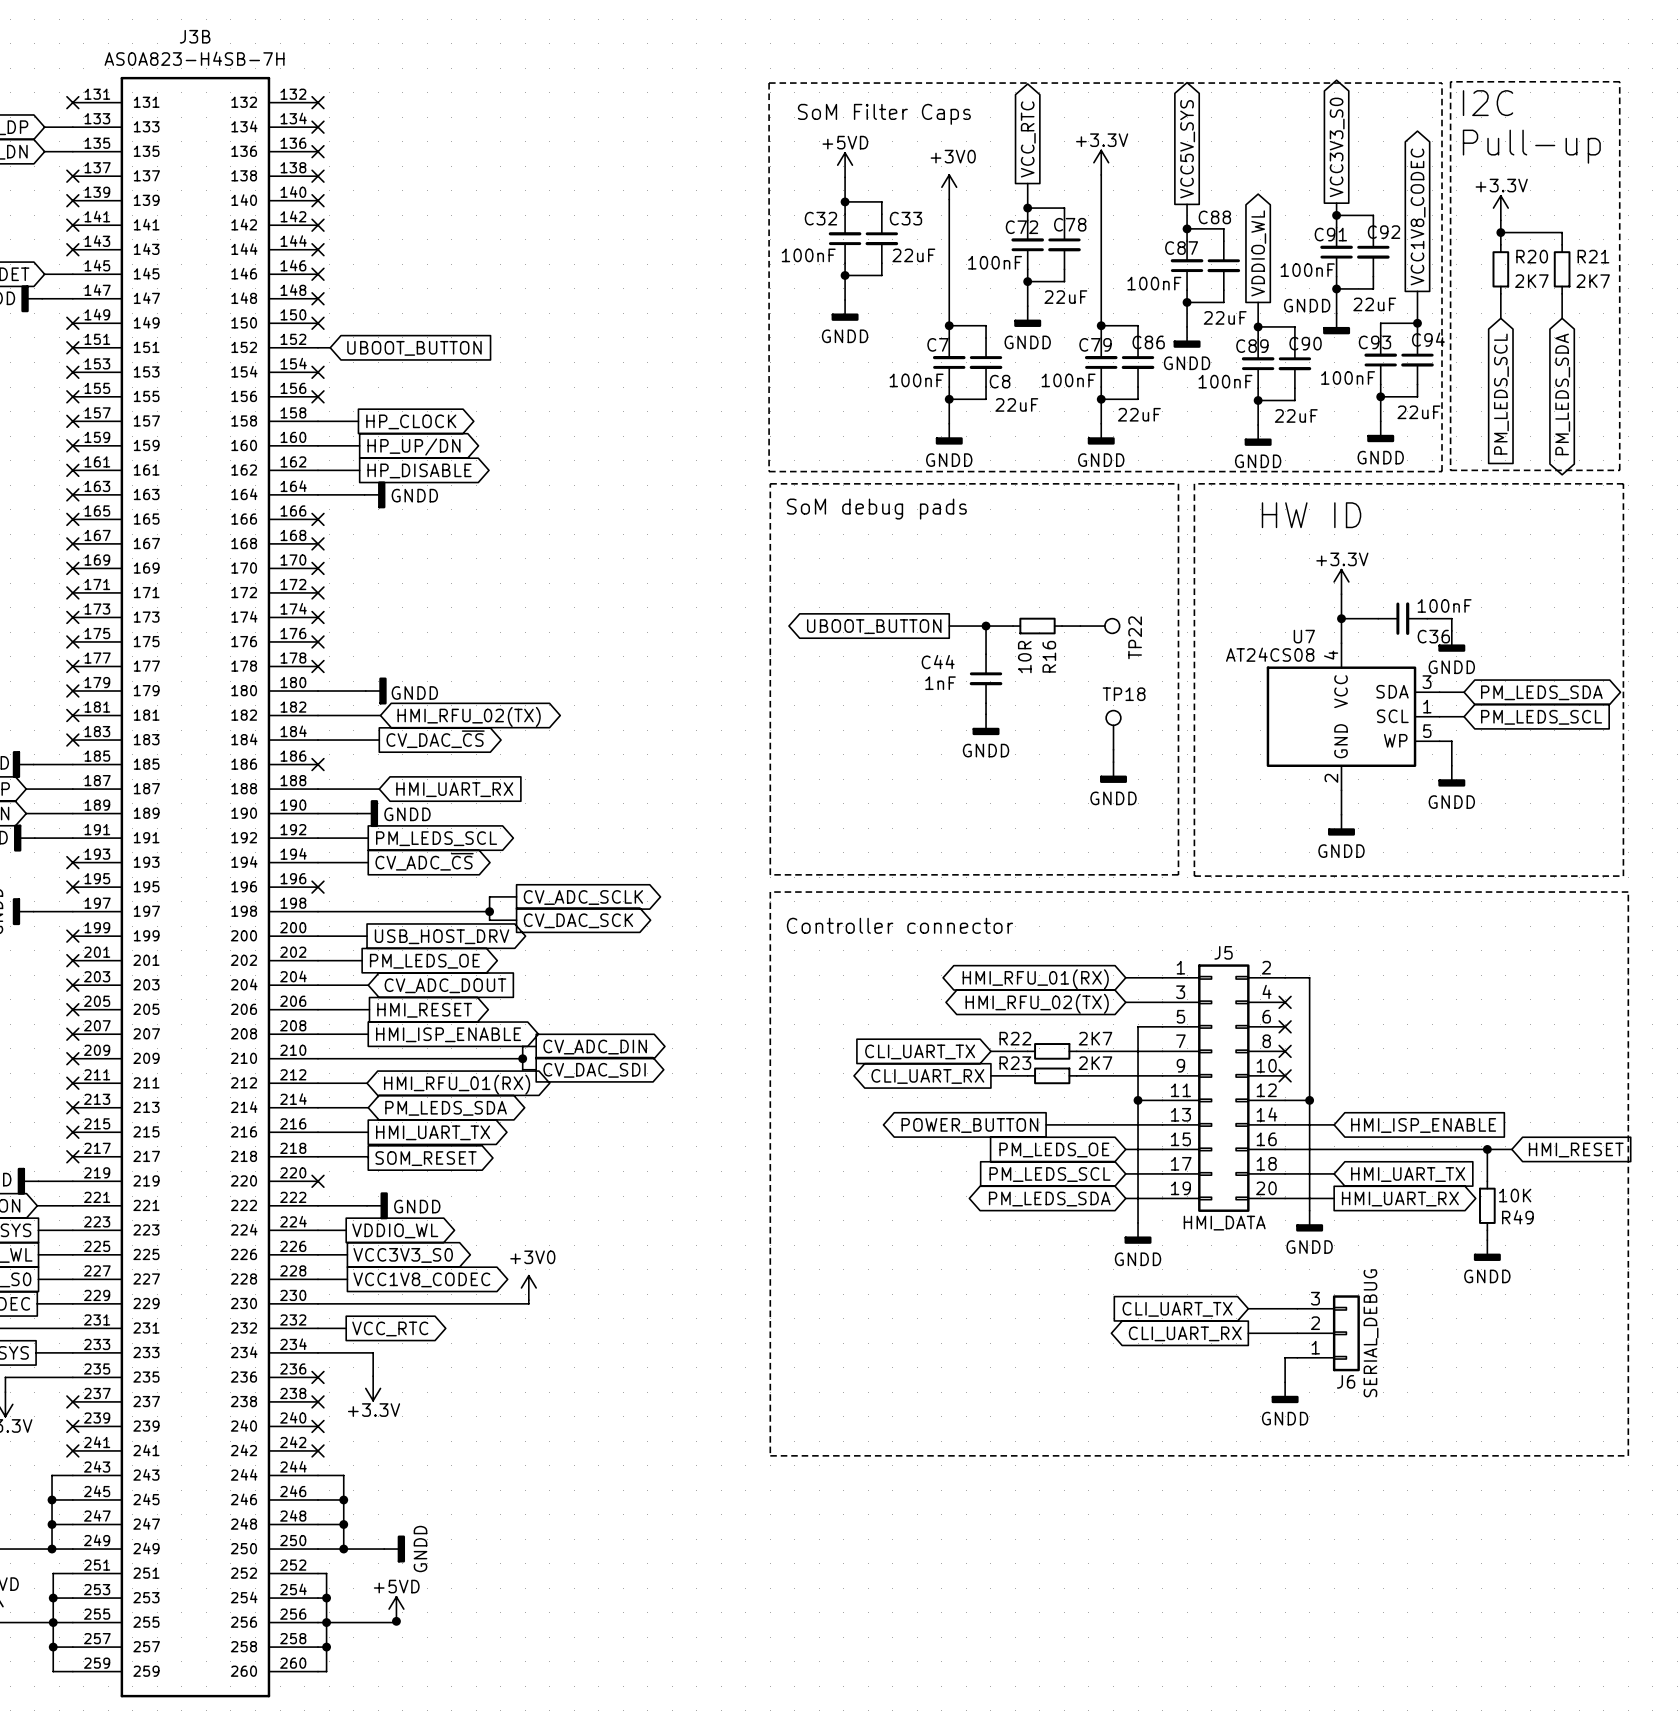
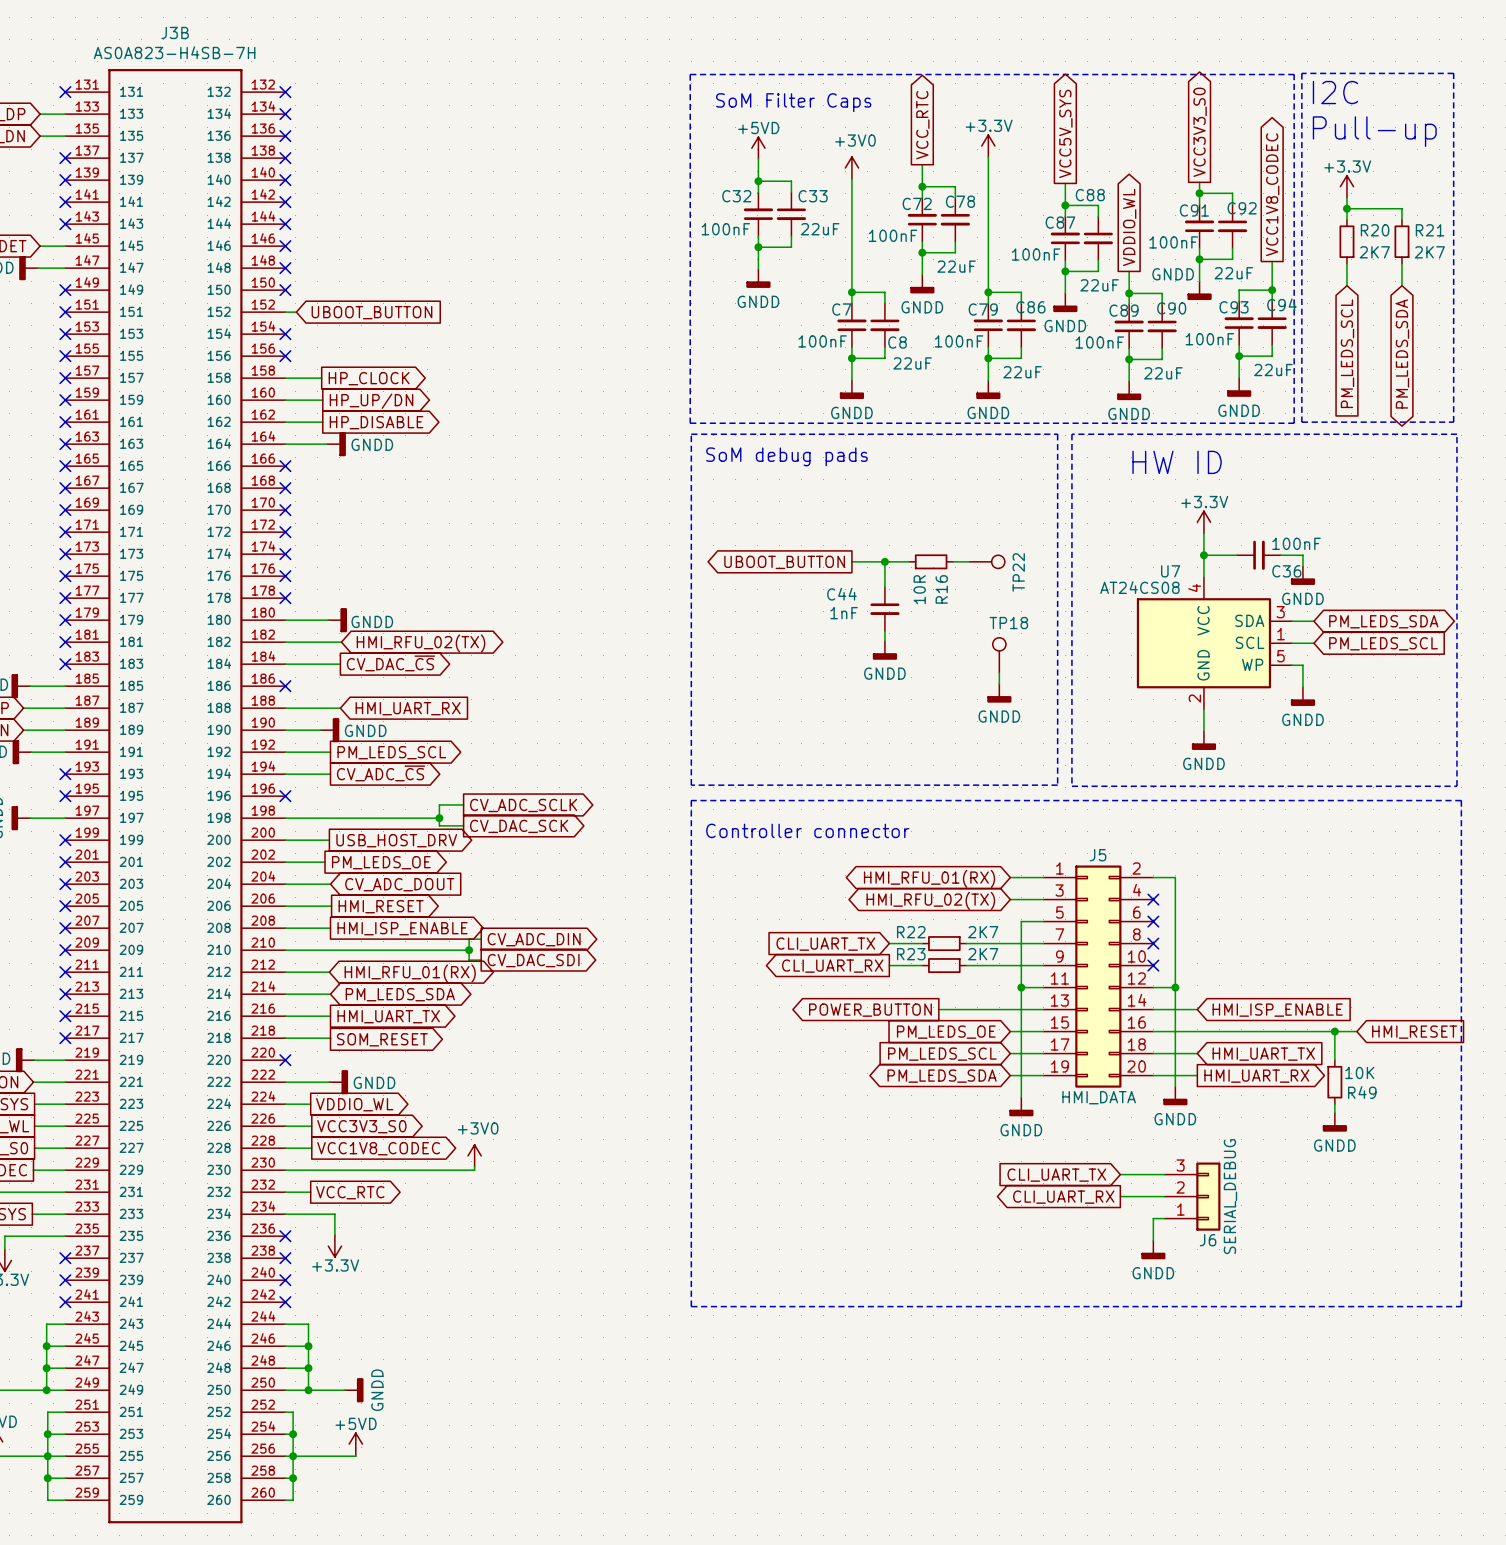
junction: (396, 1621) -> none

